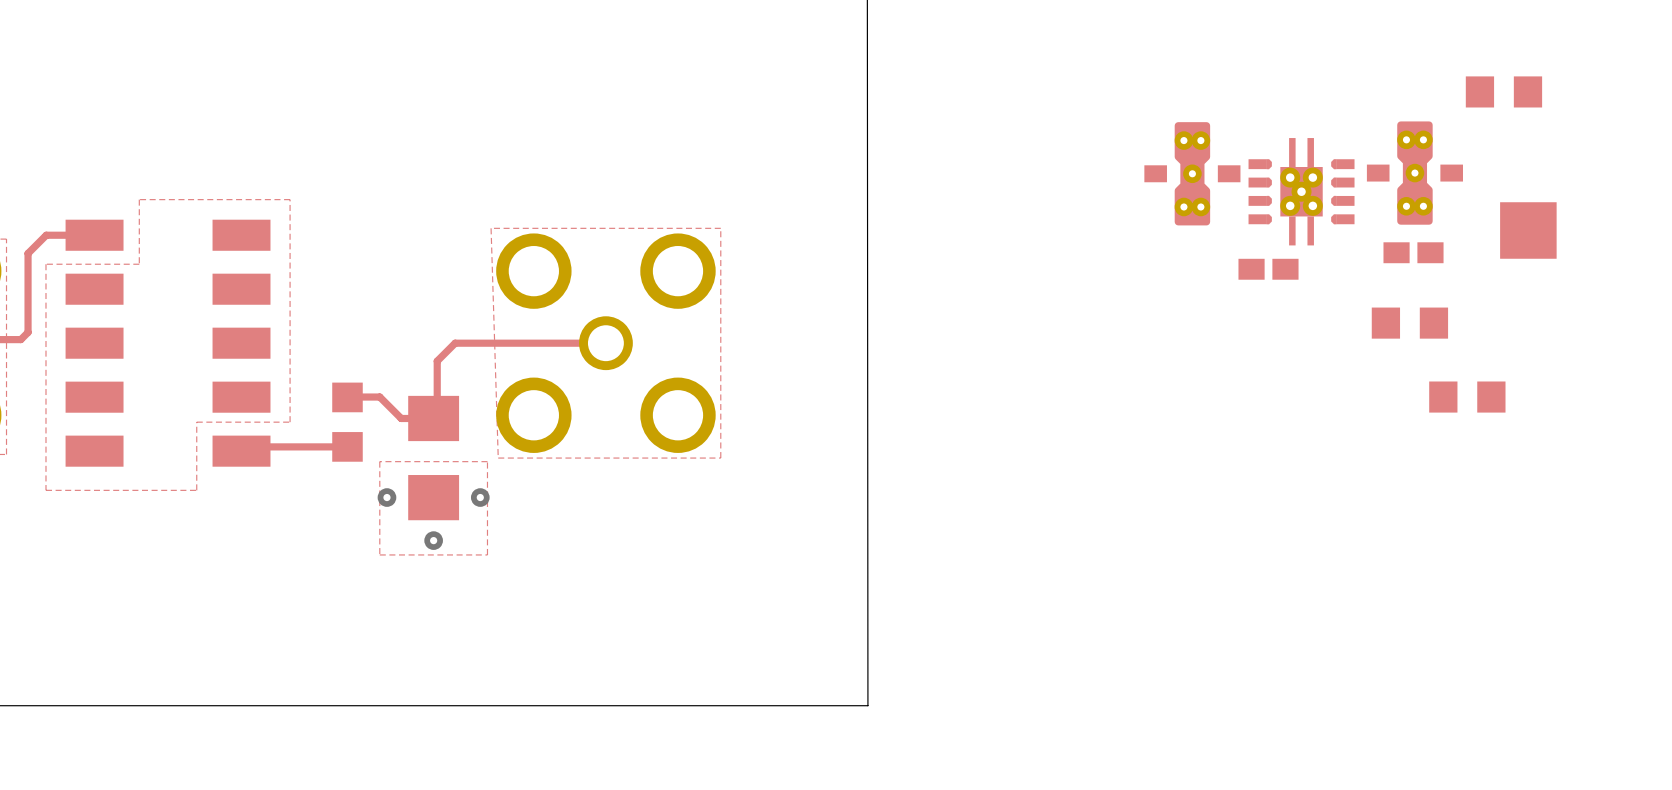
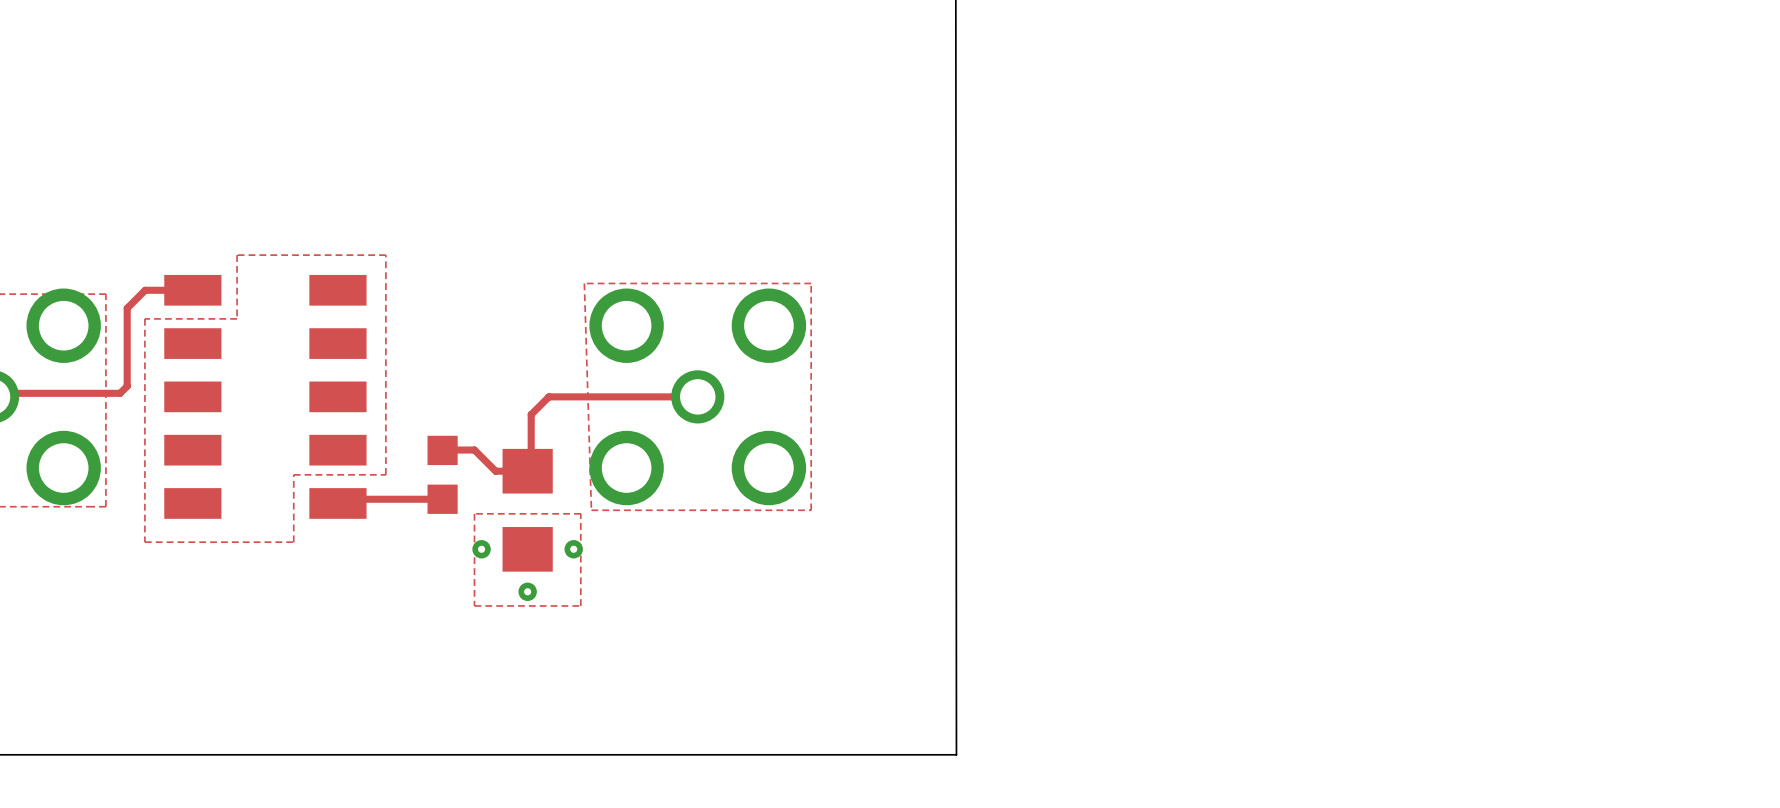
part: (1503, 91) -> none
part: (1192, 173) -> none
part: (1414, 173) -> none
part: (1301, 191) -> none
part: (1528, 230) -> none
part: (1413, 252) -> none
part: (1268, 269) -> none
part: (1409, 323) -> none
part: (1467, 397) -> none

